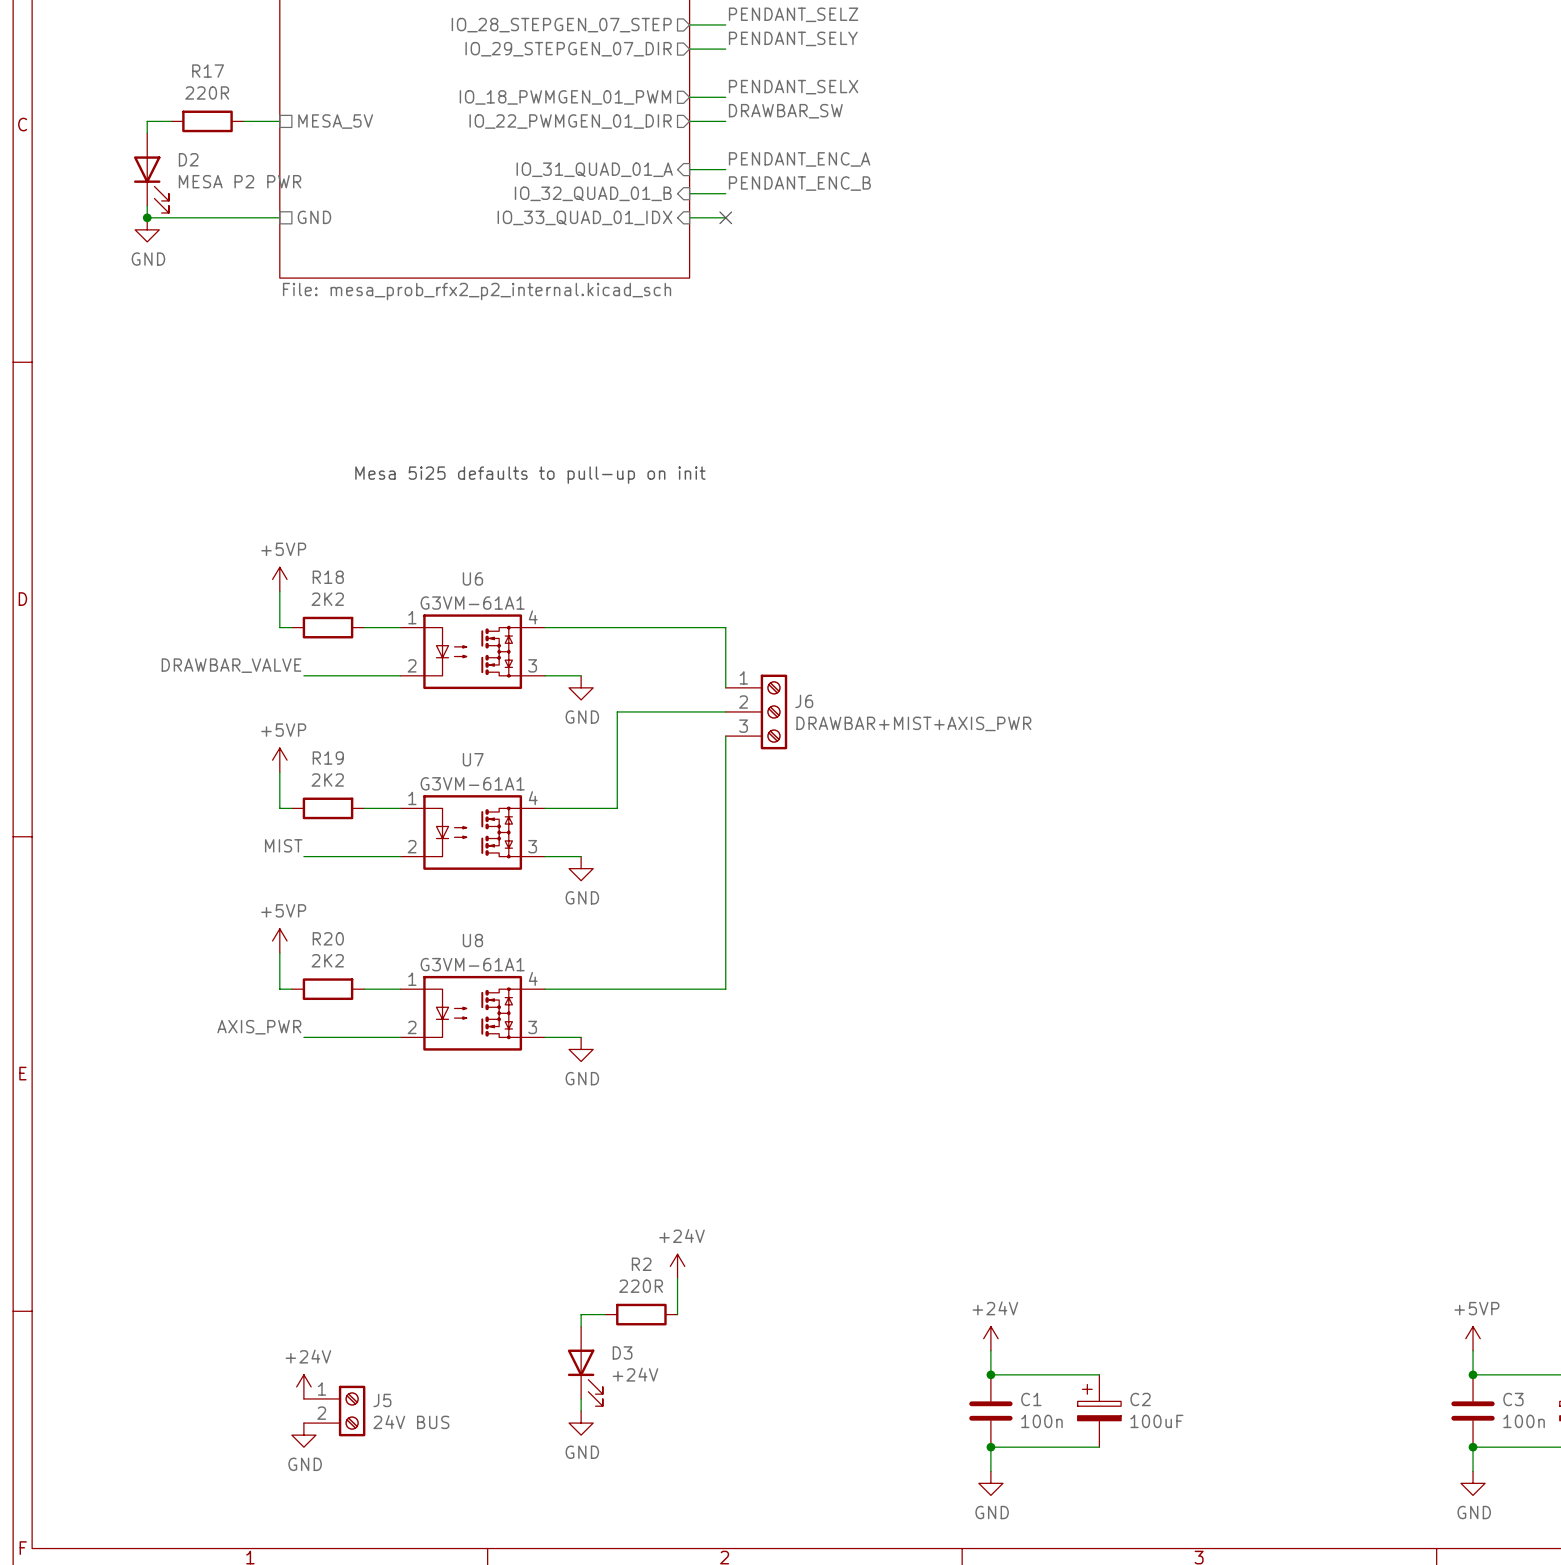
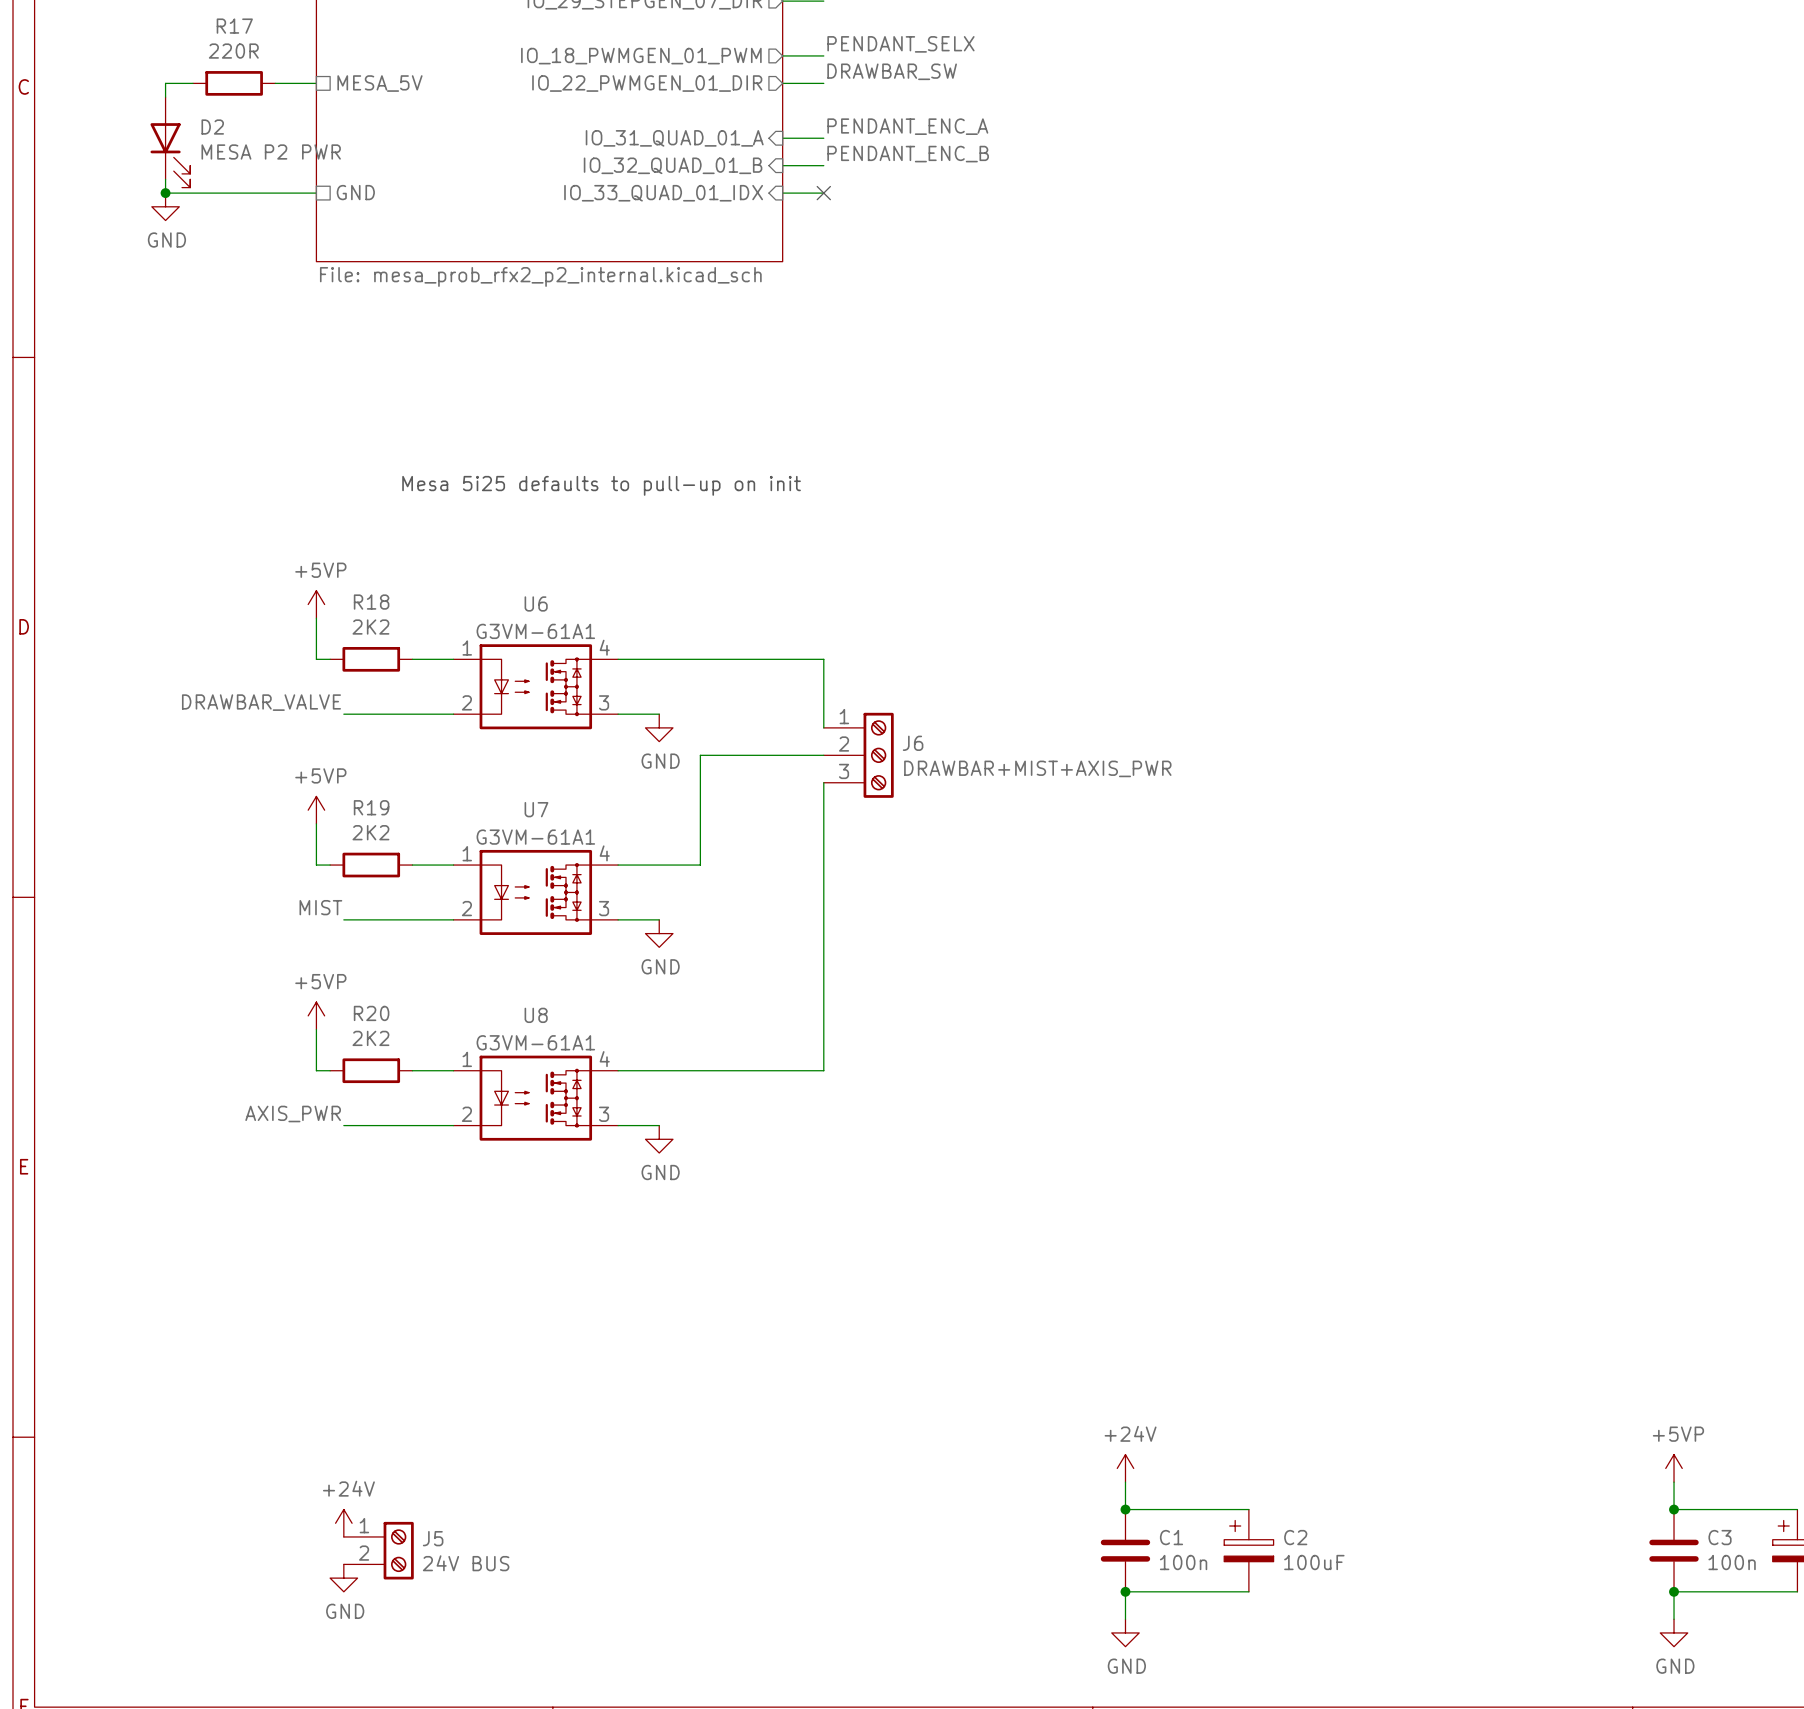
power symbol: +24V (677, 1266) -> none
wire: (677, 1278) (677, 1314) -> none
wire: (605, 1314) (581, 1314) (581, 1326) -> none
R2: 220R (641, 1314) -> none
D3: +24V (585, 1366) -> none
wire: (581, 1398) (581, 1411) -> none
power symbol: GND (581, 1423) -> none

